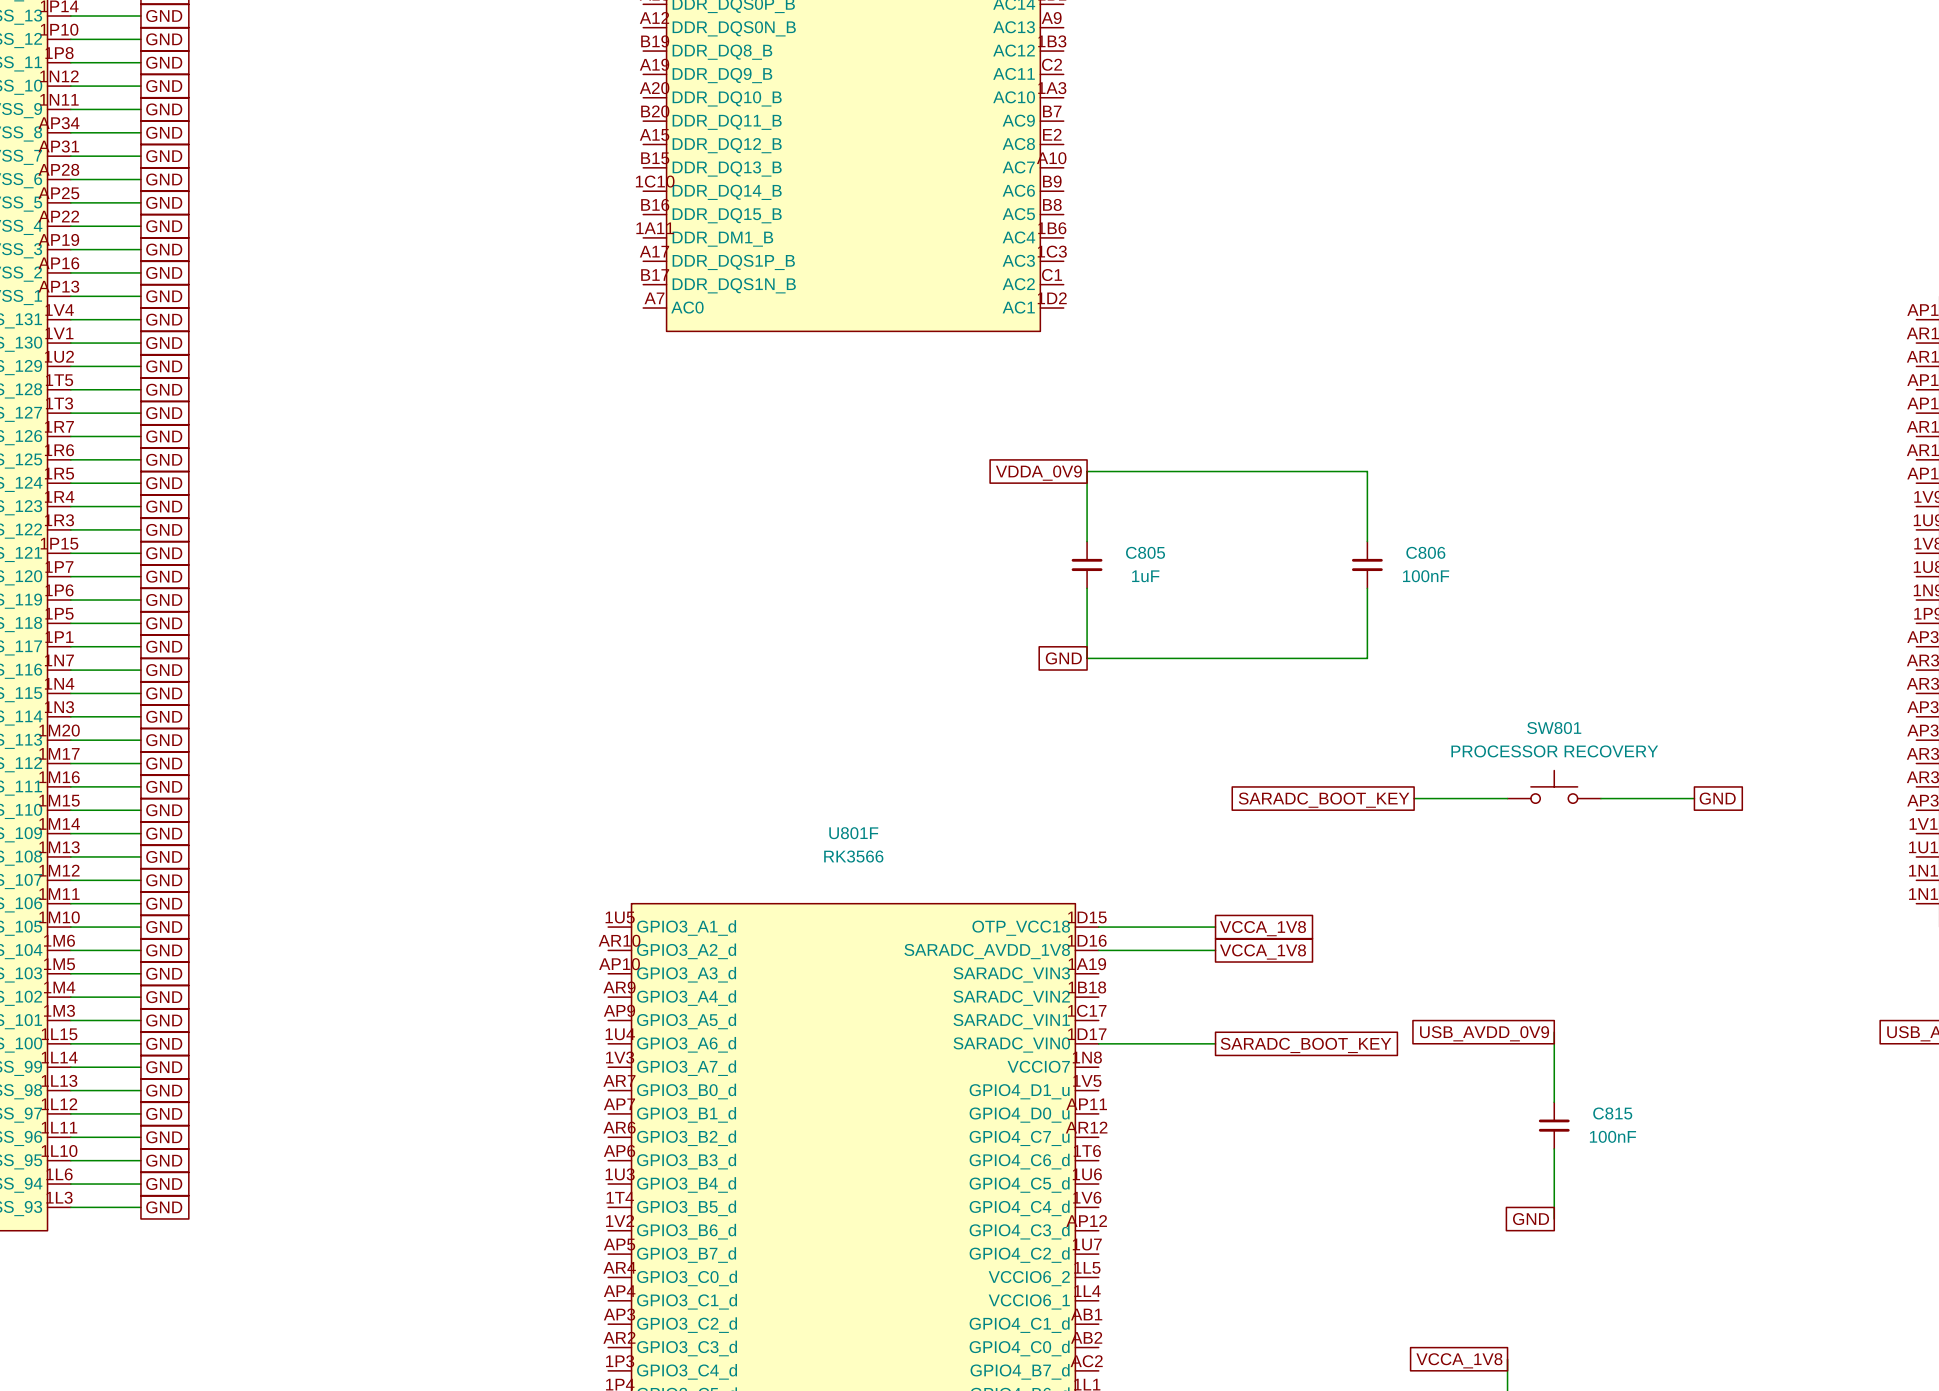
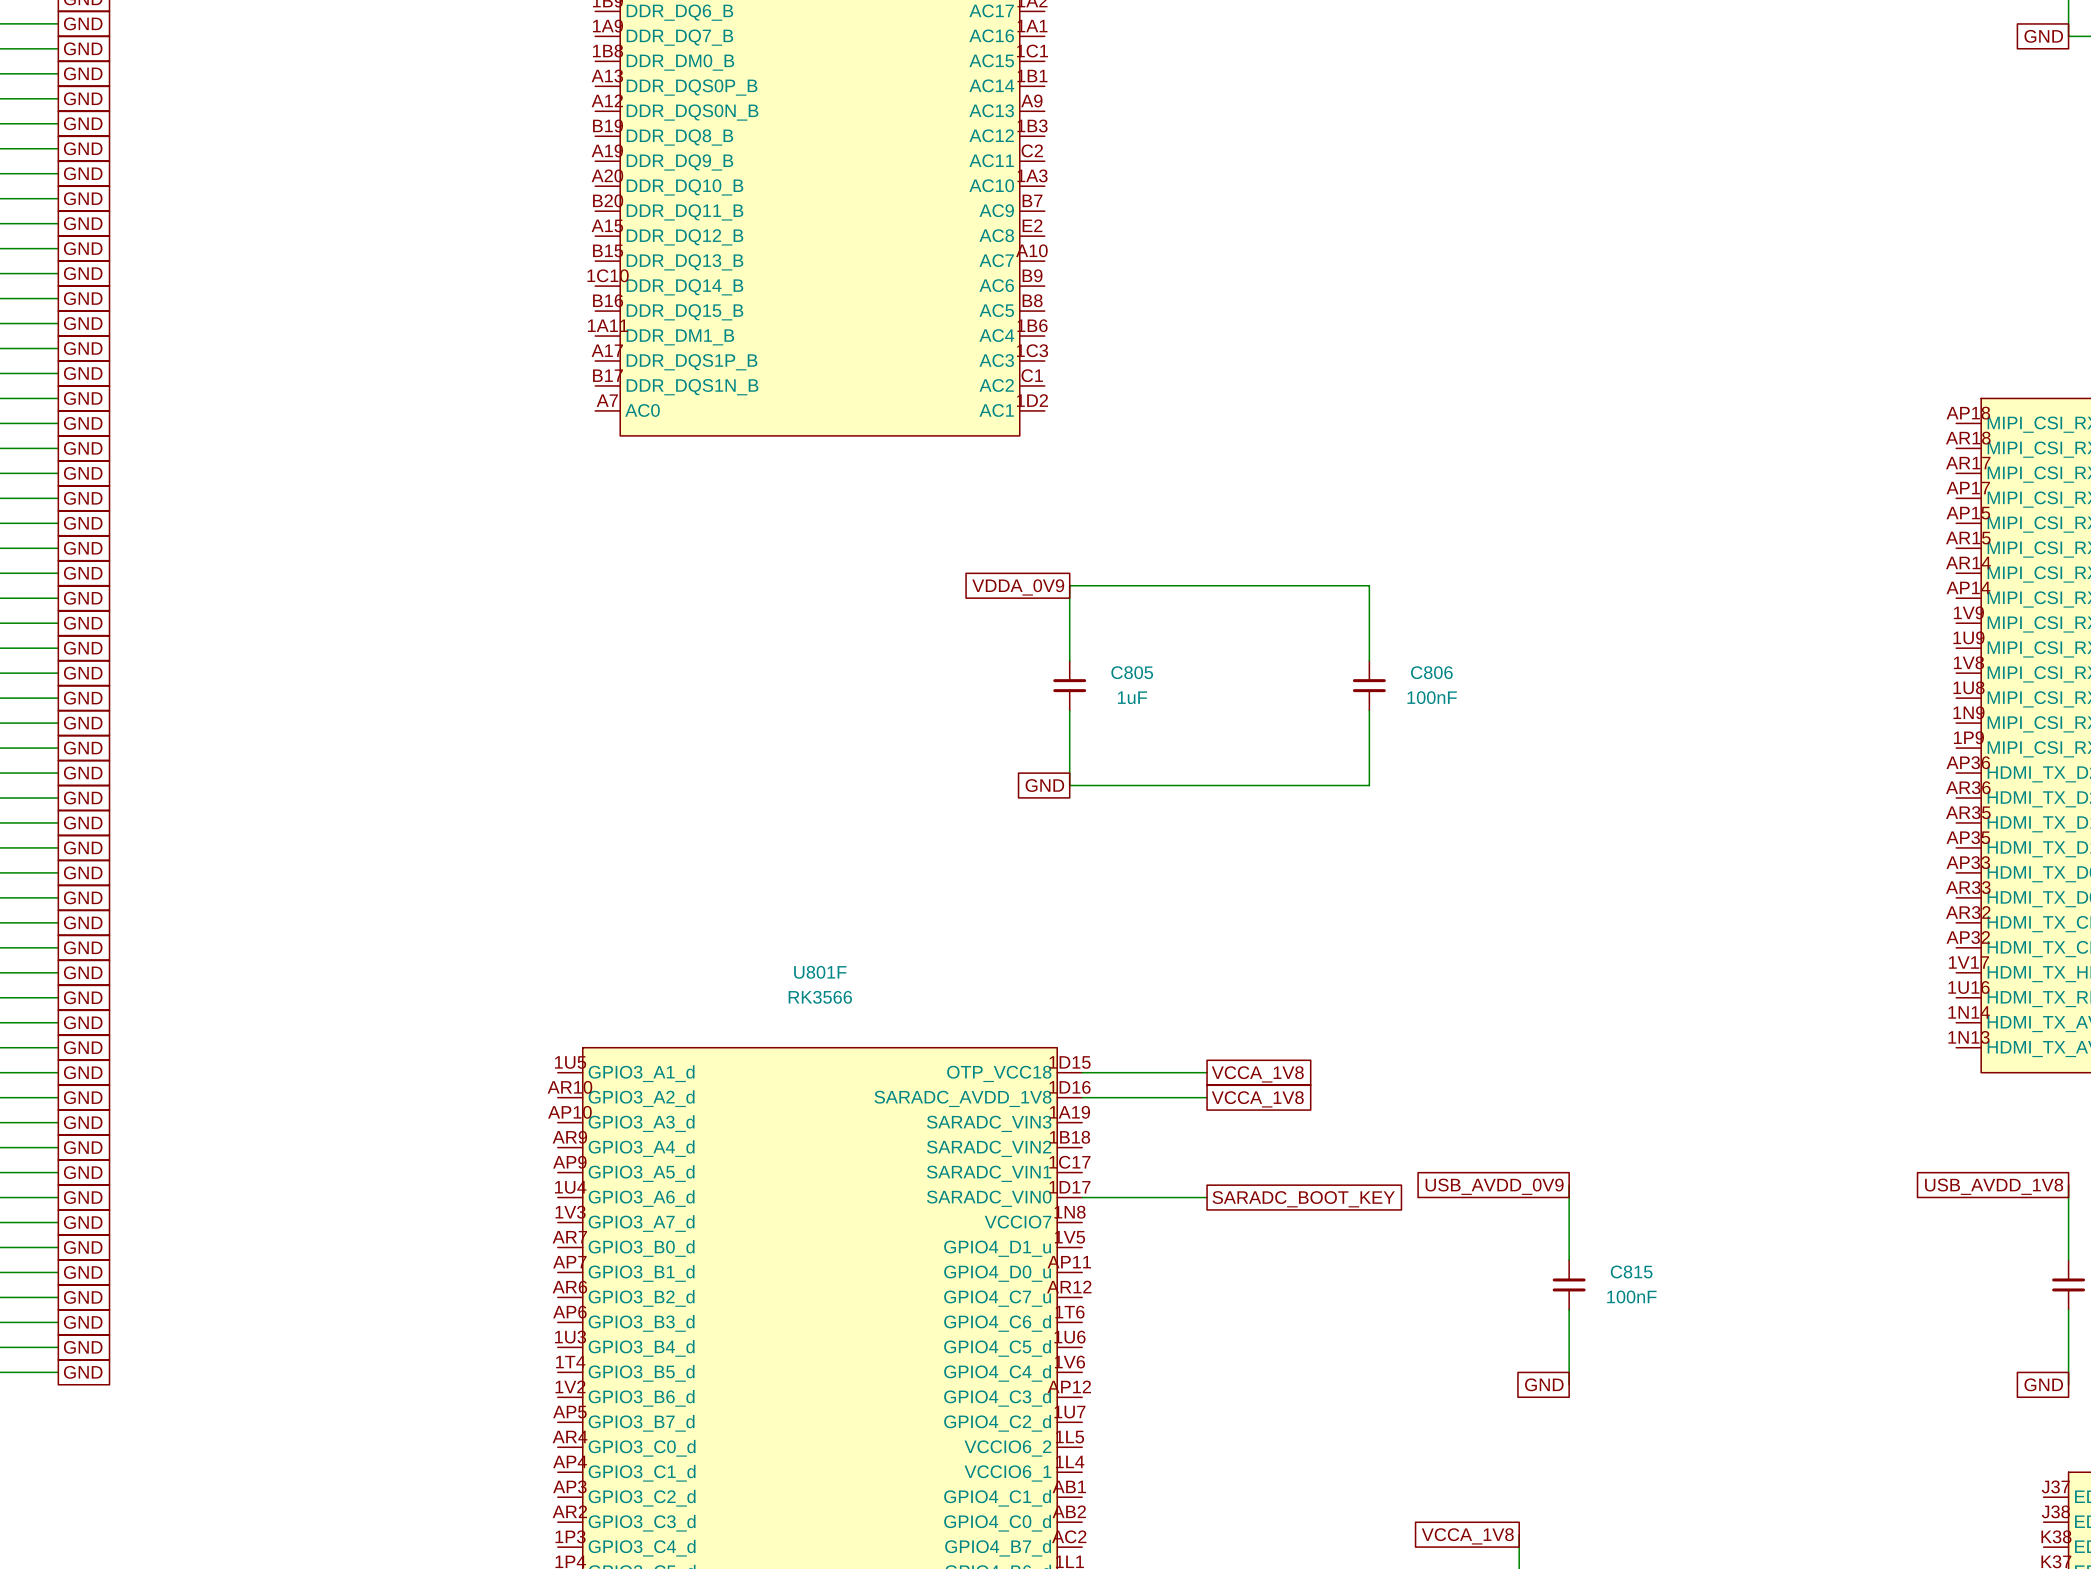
SW801: PROCESSOR RECOVERY (1554, 786) -> none
wire: (1414, 798) (1507, 798) -> none
wire: (1600, 798) (1694, 798) -> none
global label: GND (1717, 798) -> none
global label: SARADC_BOOT_KEY (1324, 800) -> none

